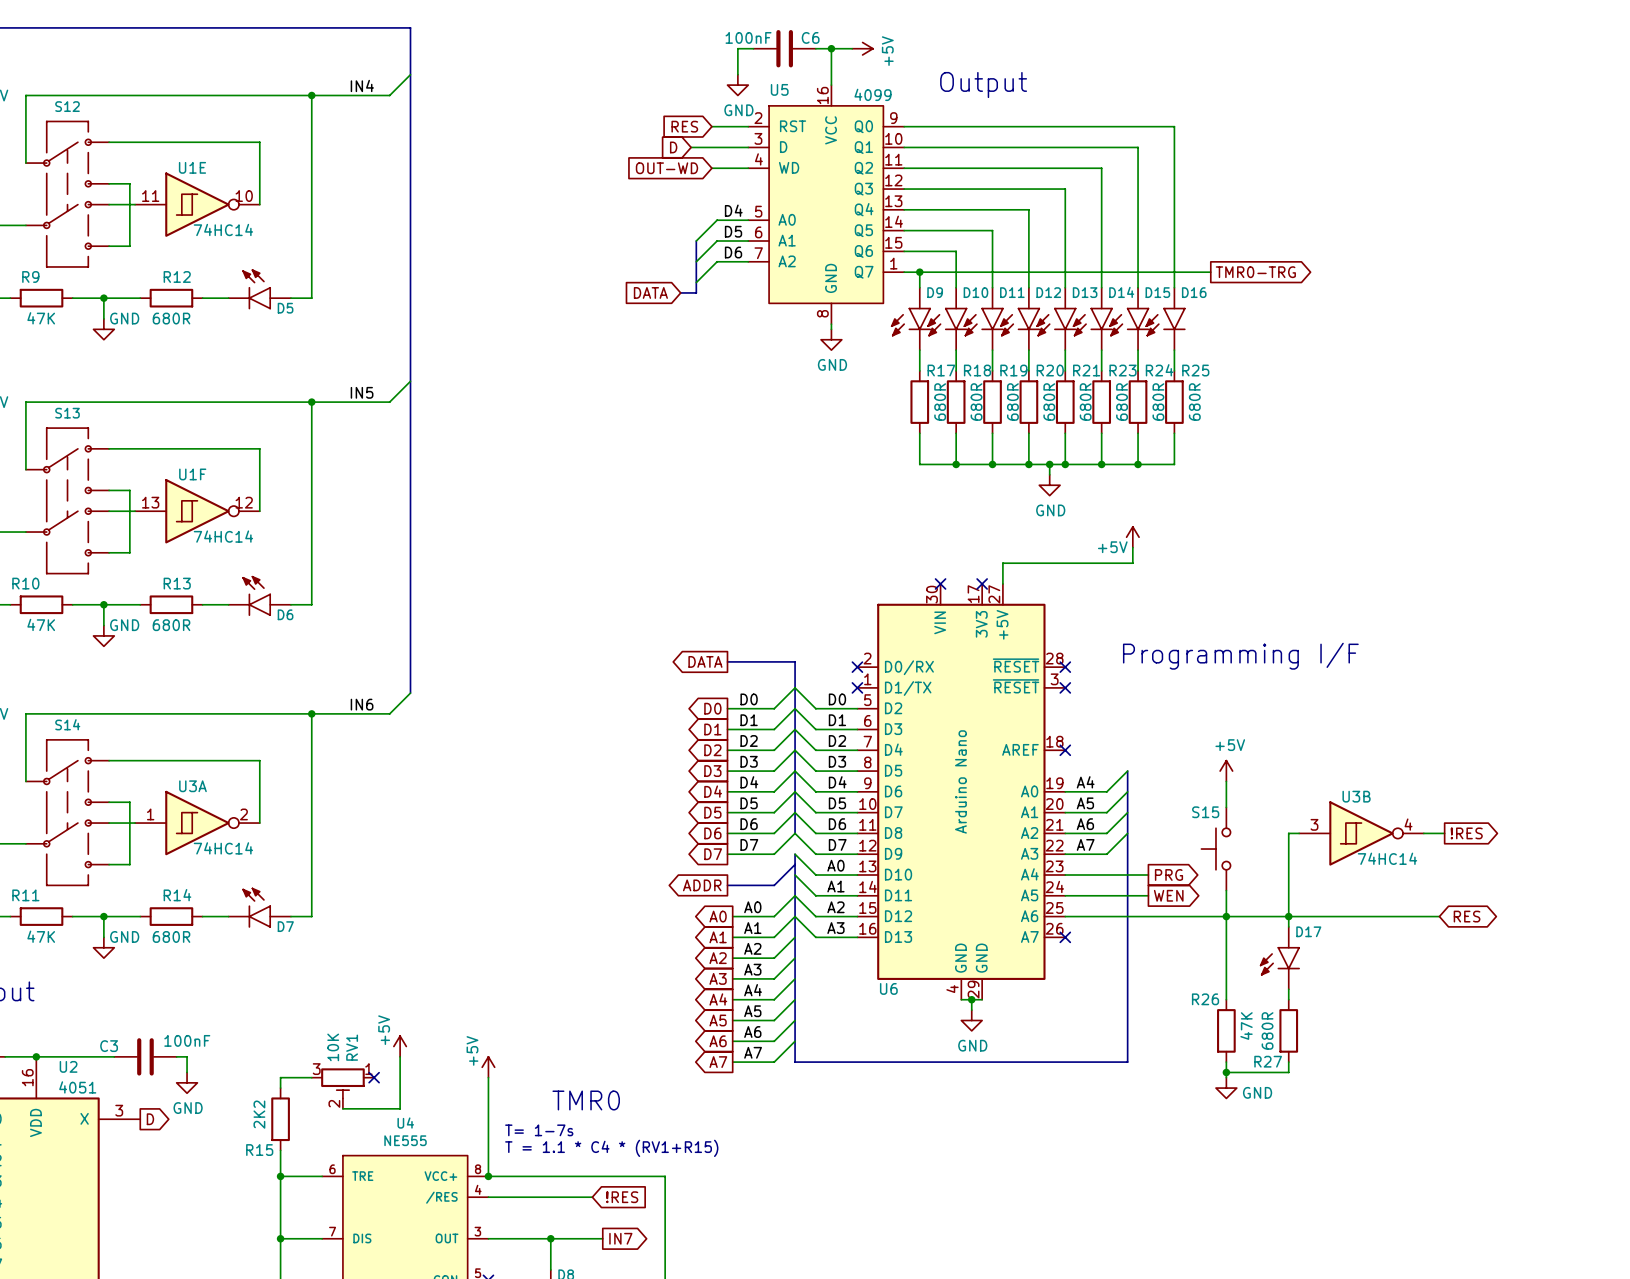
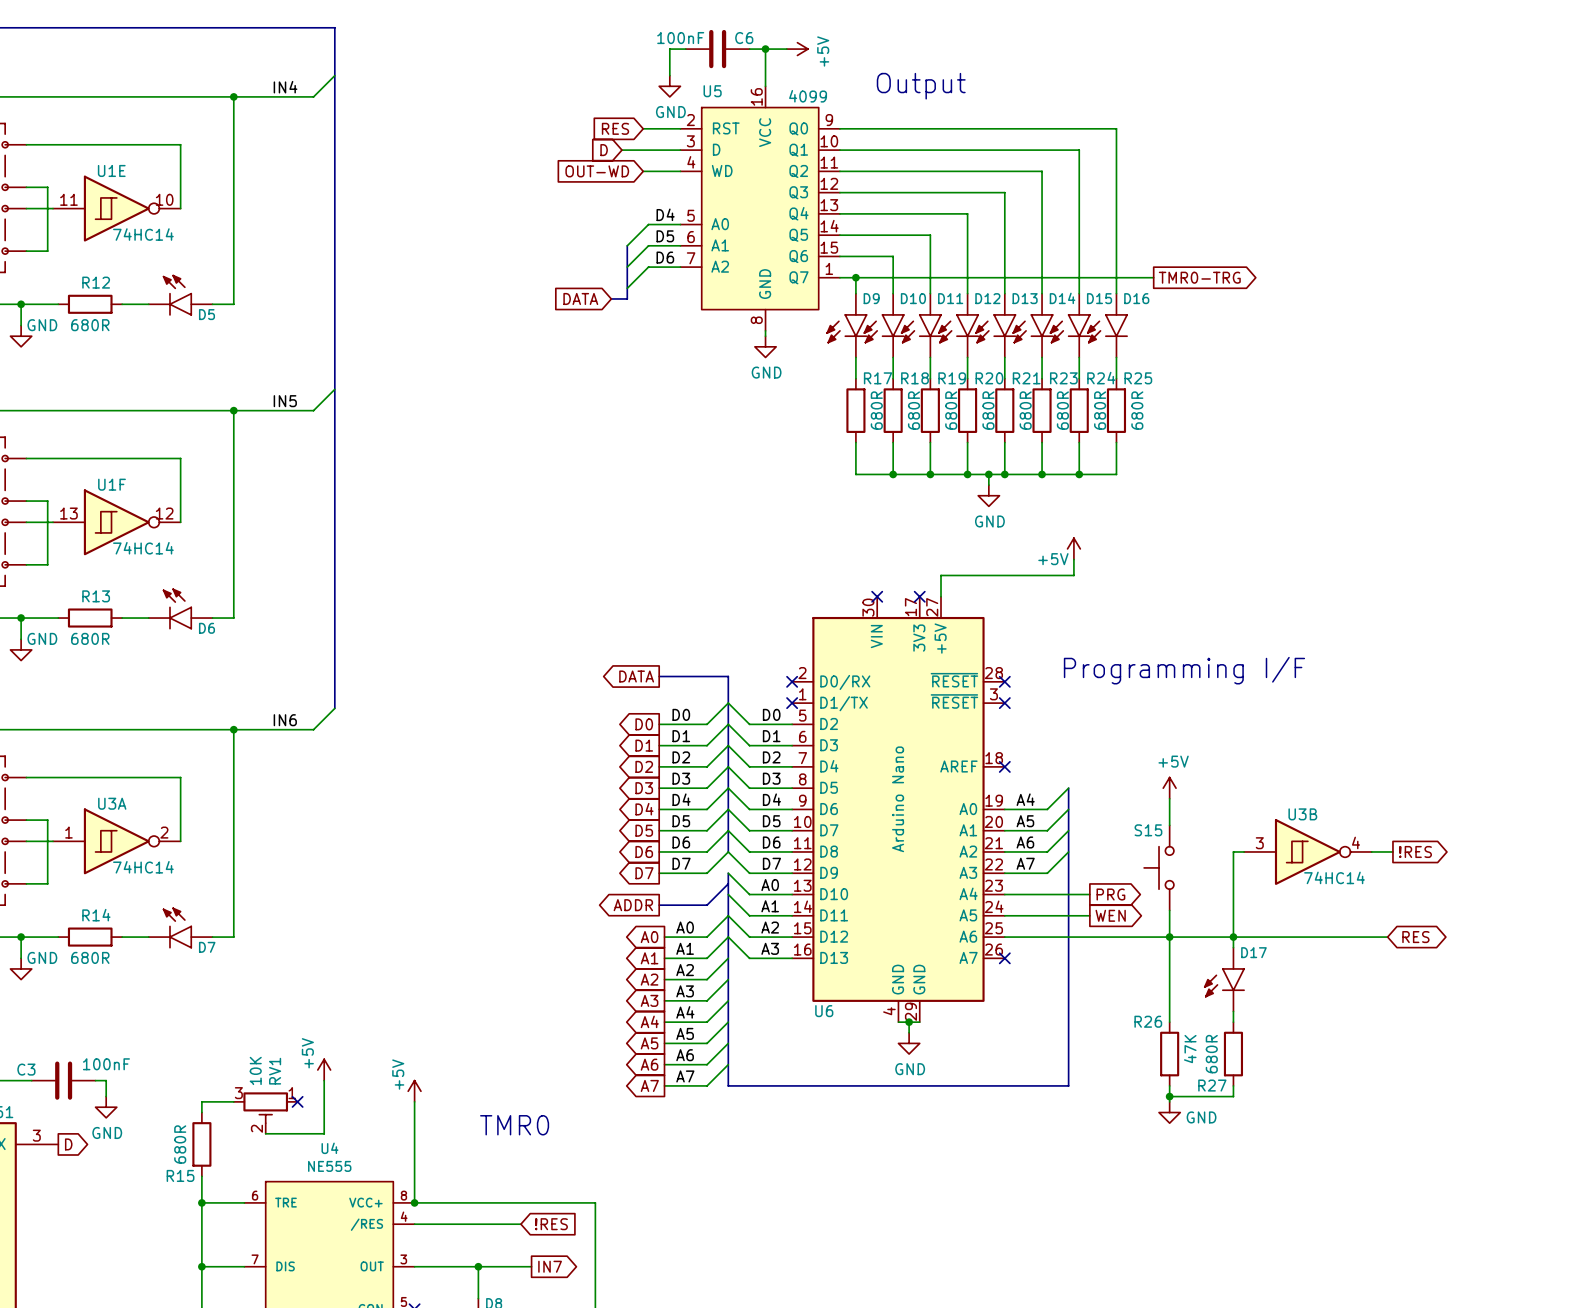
R15 value: 2K2 (259, 1114) -> 680R (180, 1144)
text: T= 1-7s (539, 1130) -> none
text: T = 1.1 * C4 * (RV1+R15) (611, 1148) -> none

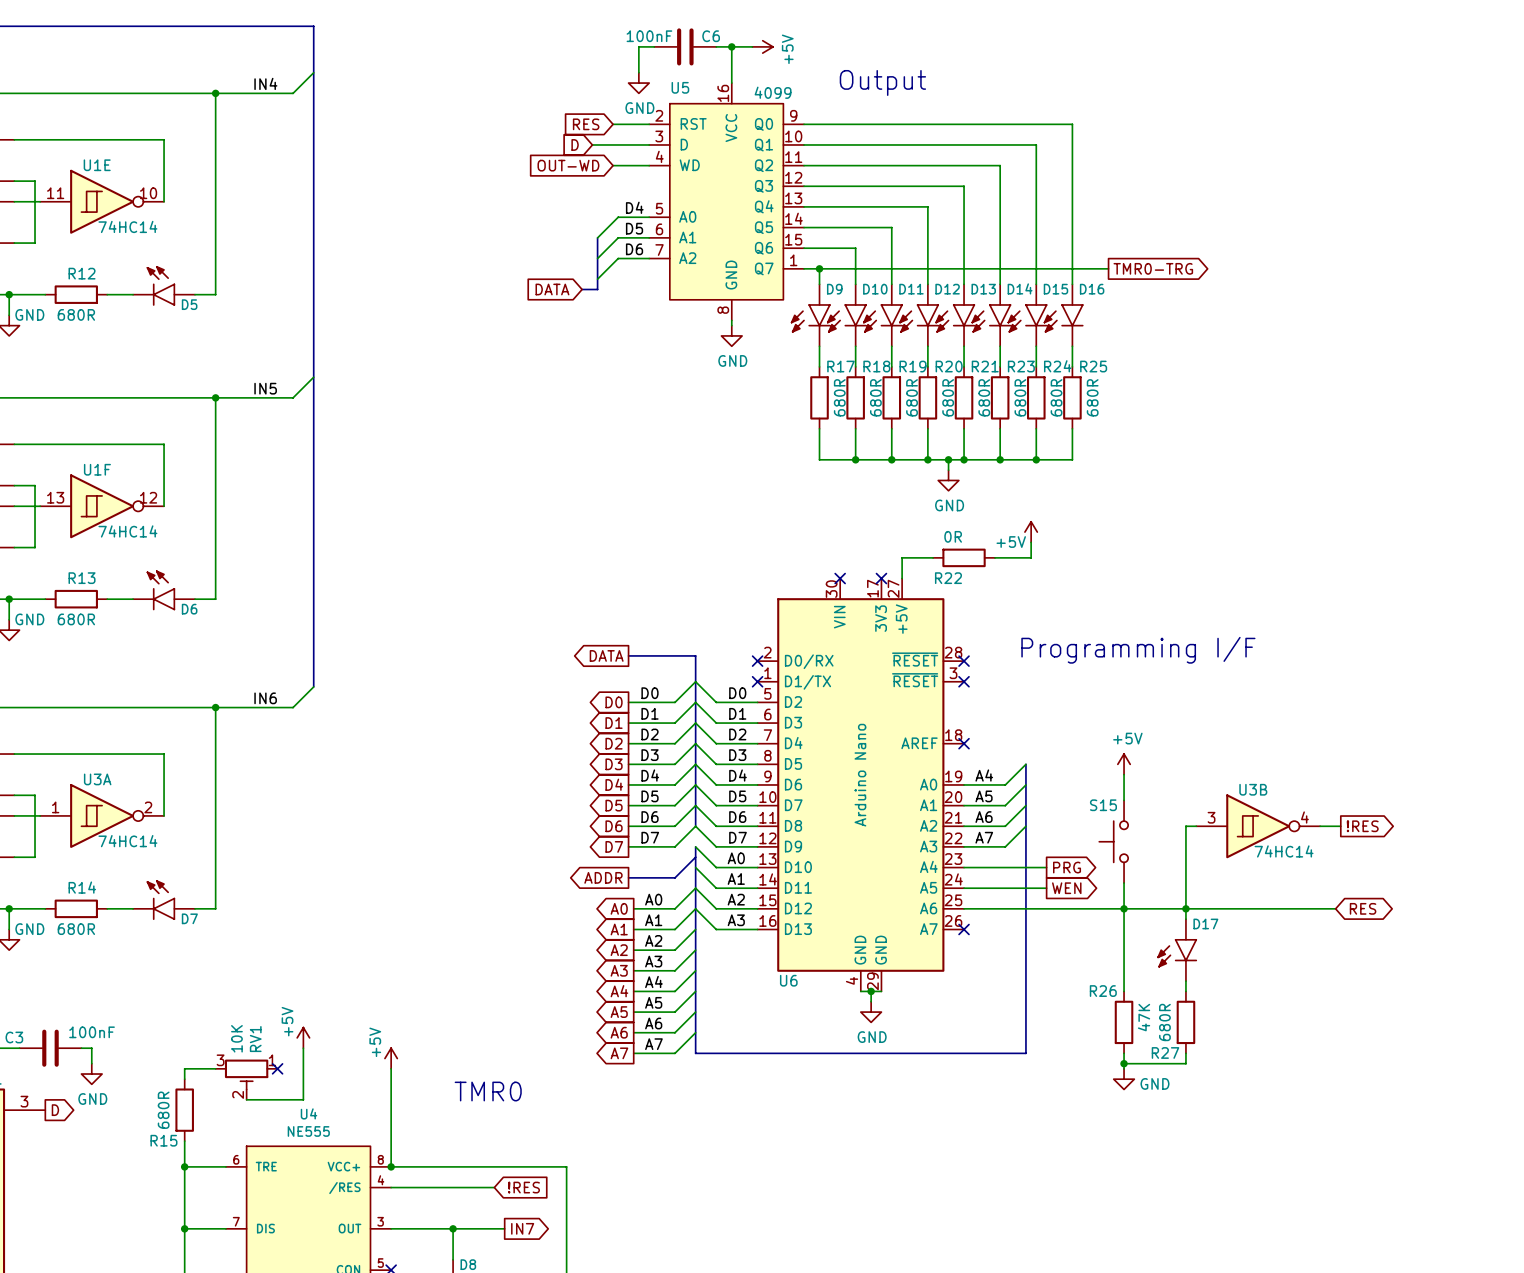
wire: (972, 575) (1036, 575) -> none
R22: none -> 0R (964, 557)

